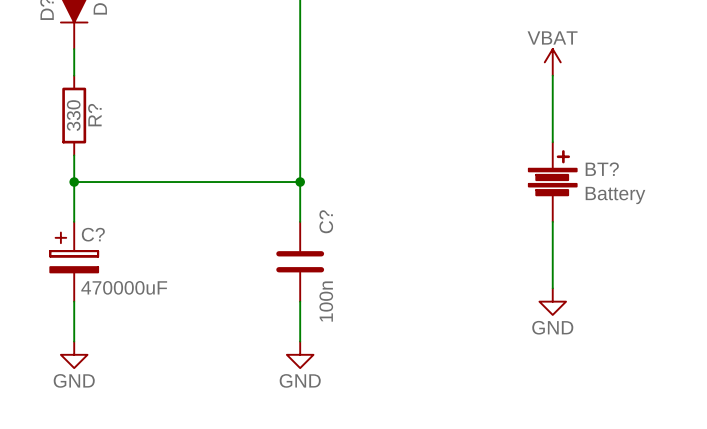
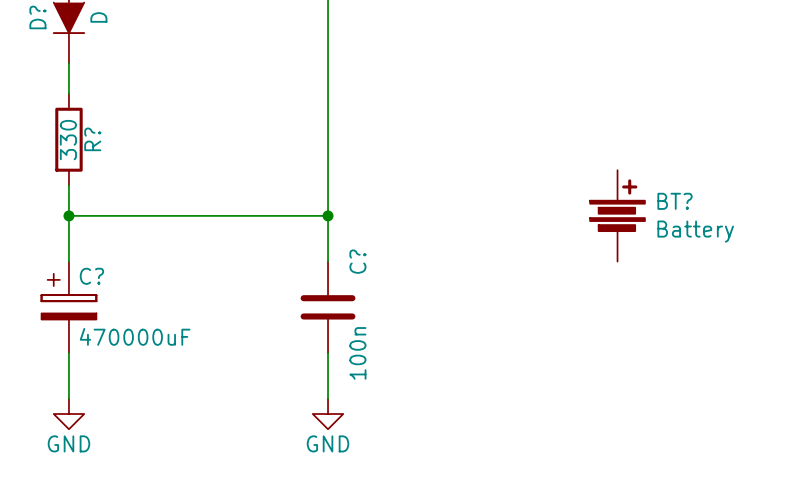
power symbol: VBAT (552, 62) -> none
wire: (552, 75) (552, 142) -> none
wire: (552, 221) (552, 288) -> none
power symbol: GND (552, 301) -> none

